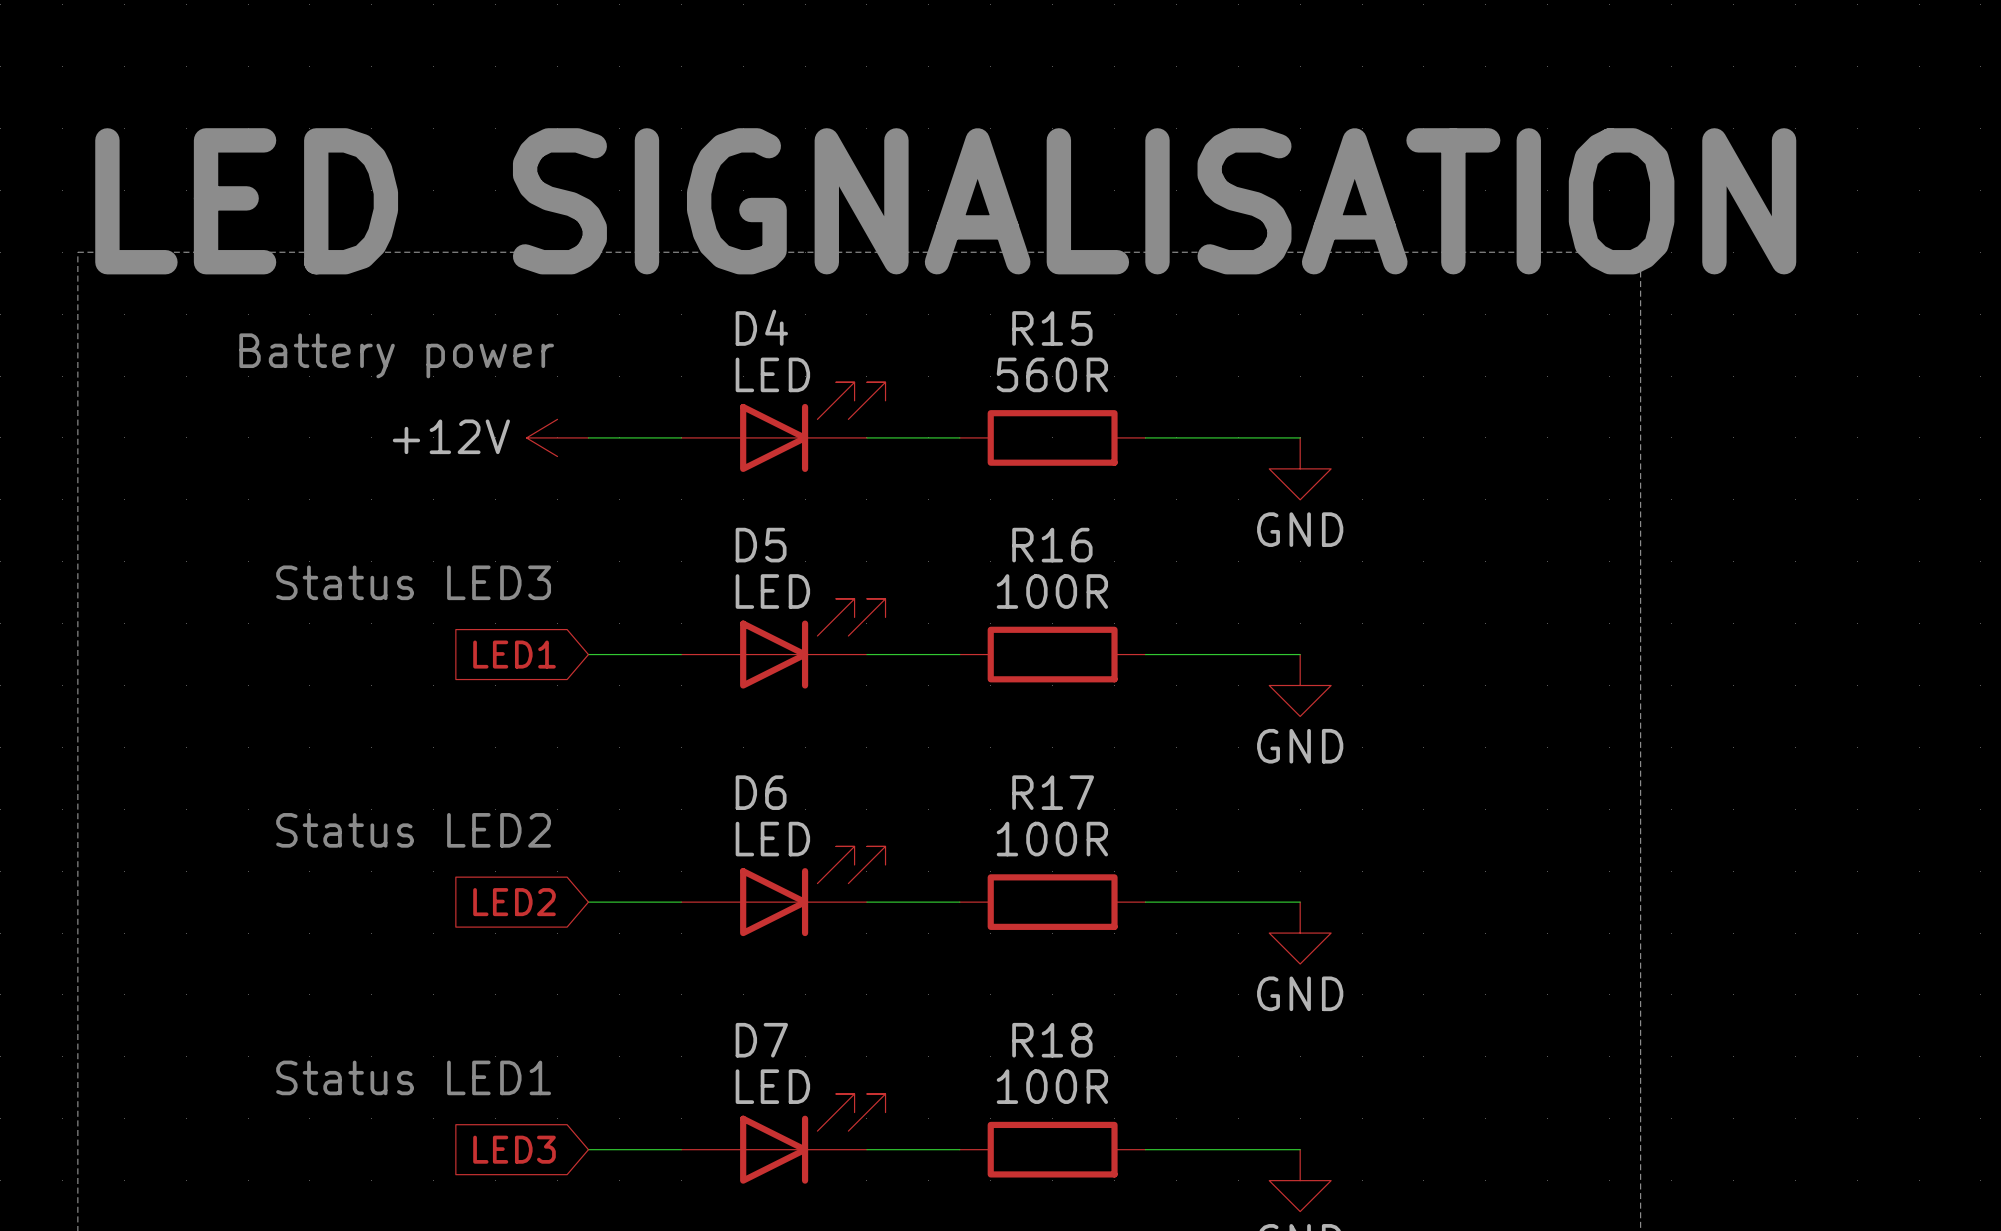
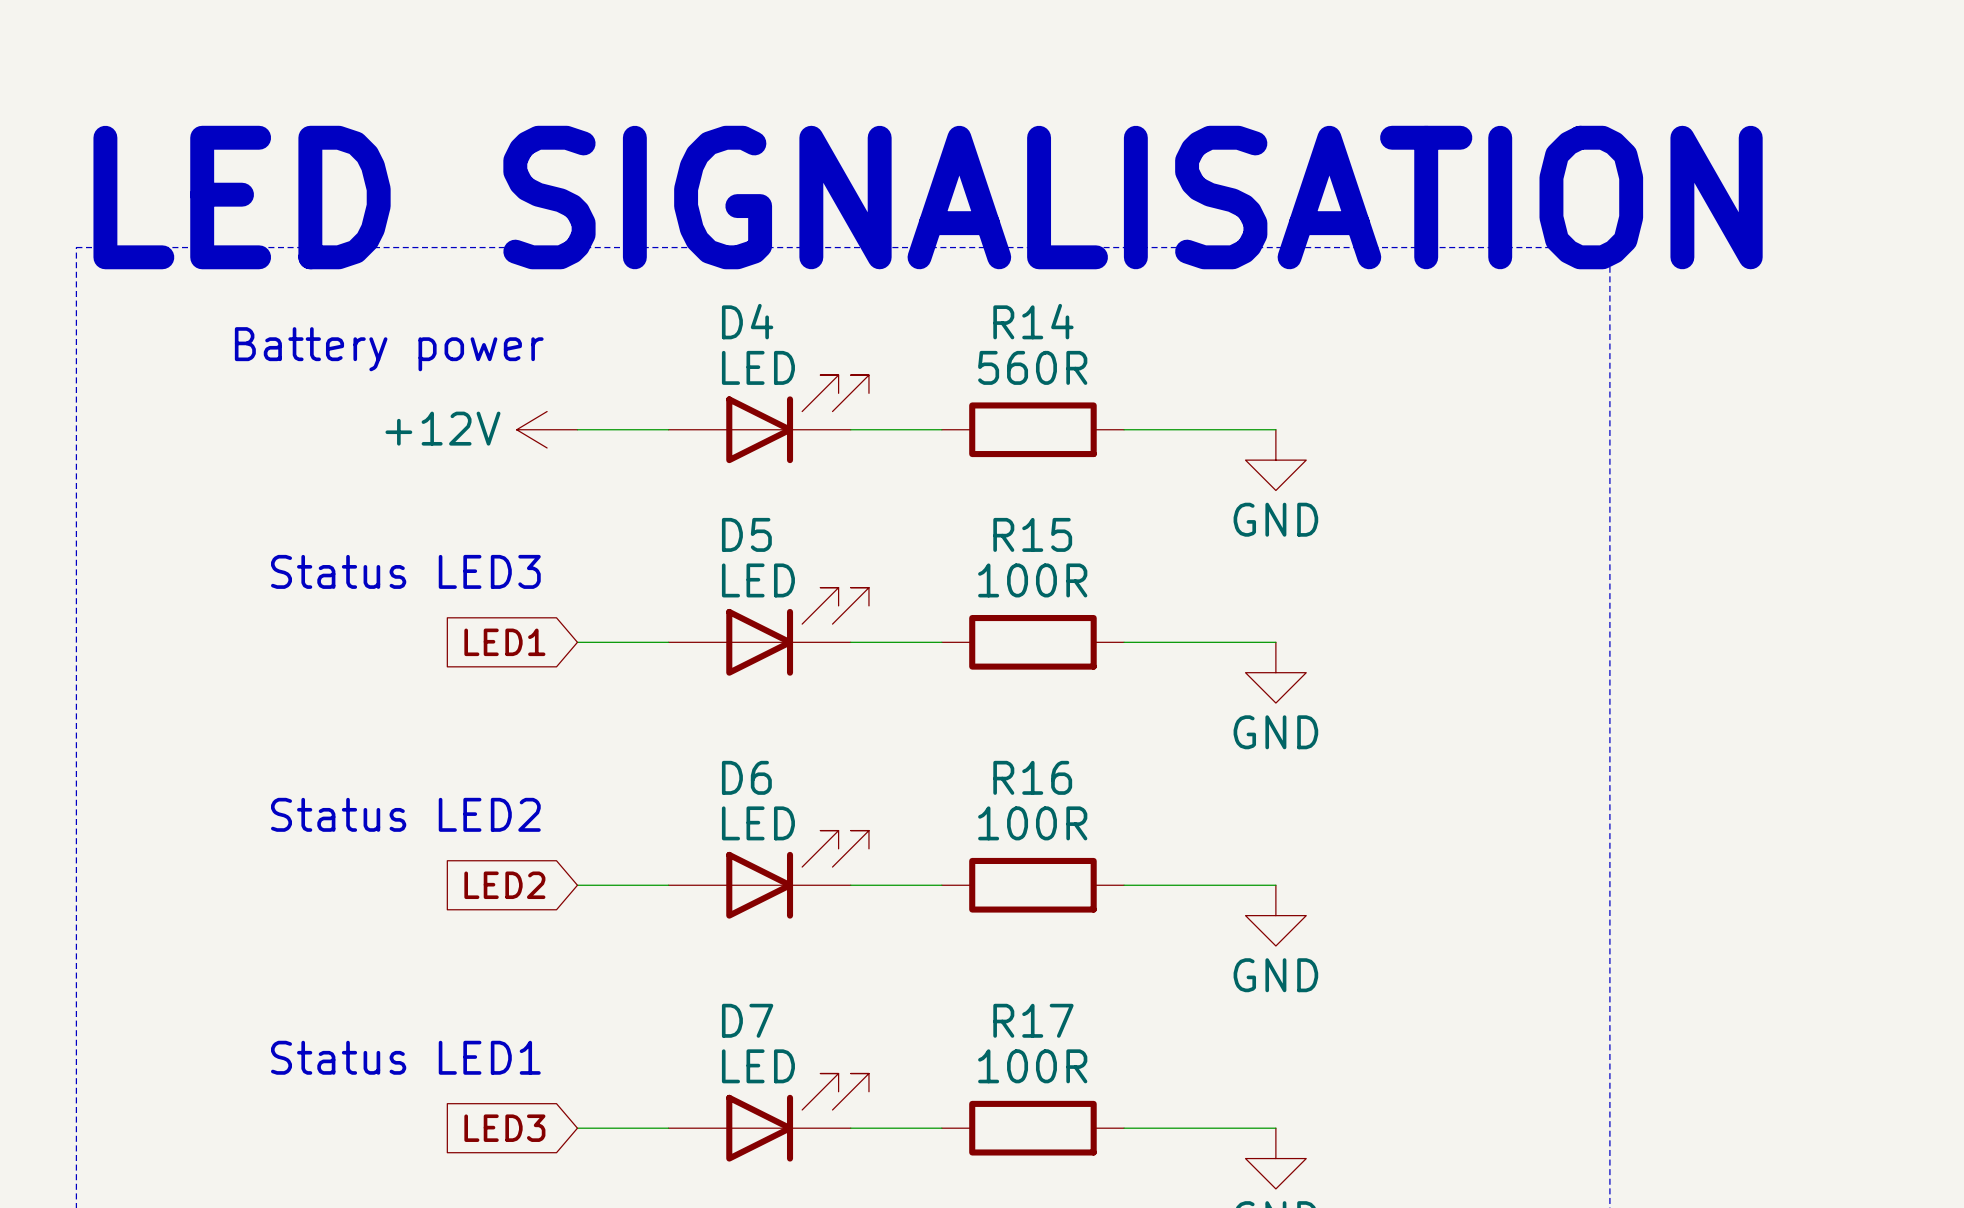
R15 name: R15 (1052, 328) -> R14 (1033, 321)
R16 name: R16 (1052, 545) -> R15 (1032, 534)
R17 name: R17 (1053, 792) -> R16 (1032, 777)
R18 name: R18 (1052, 1040) -> R17 (1033, 1020)

